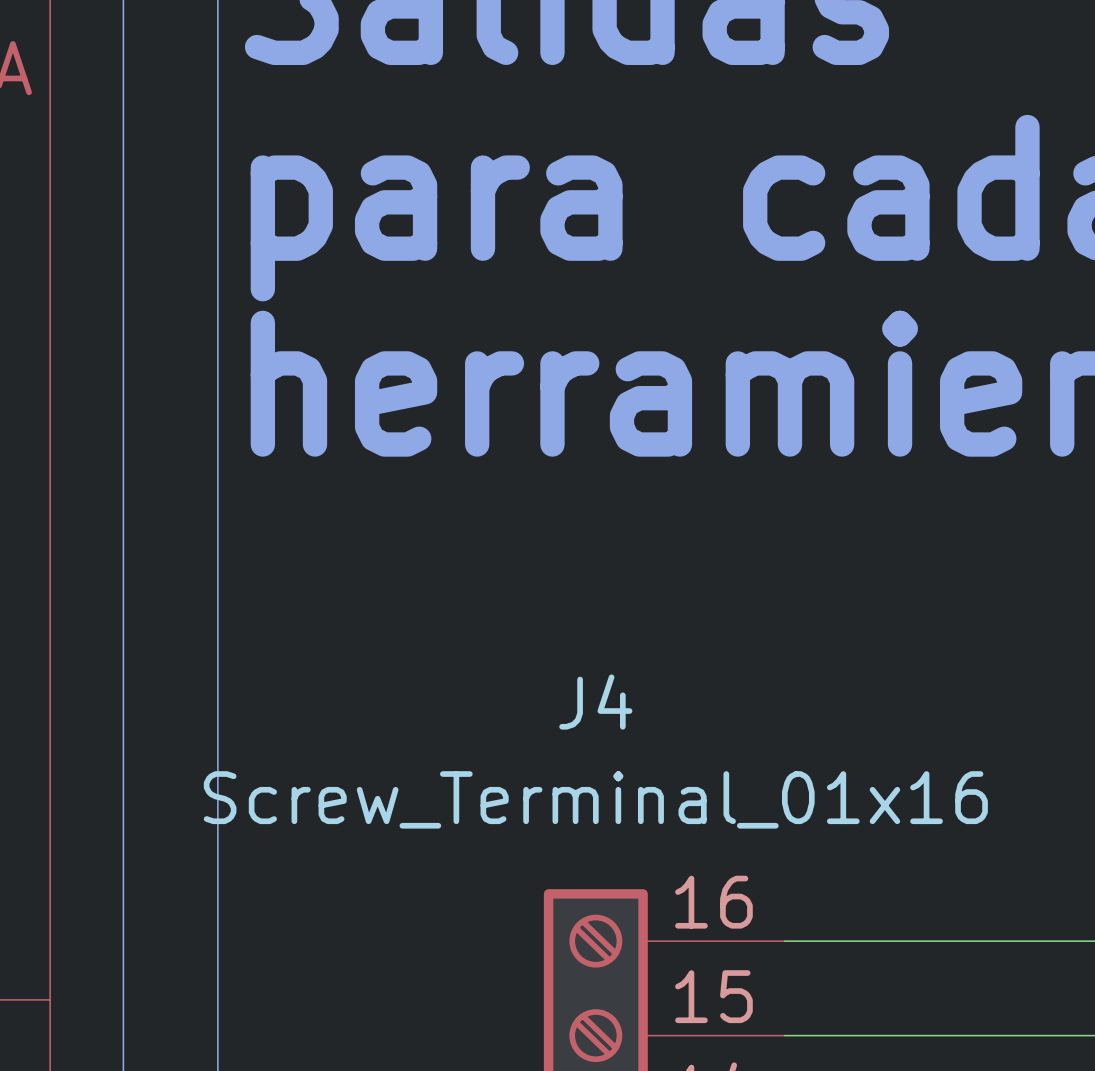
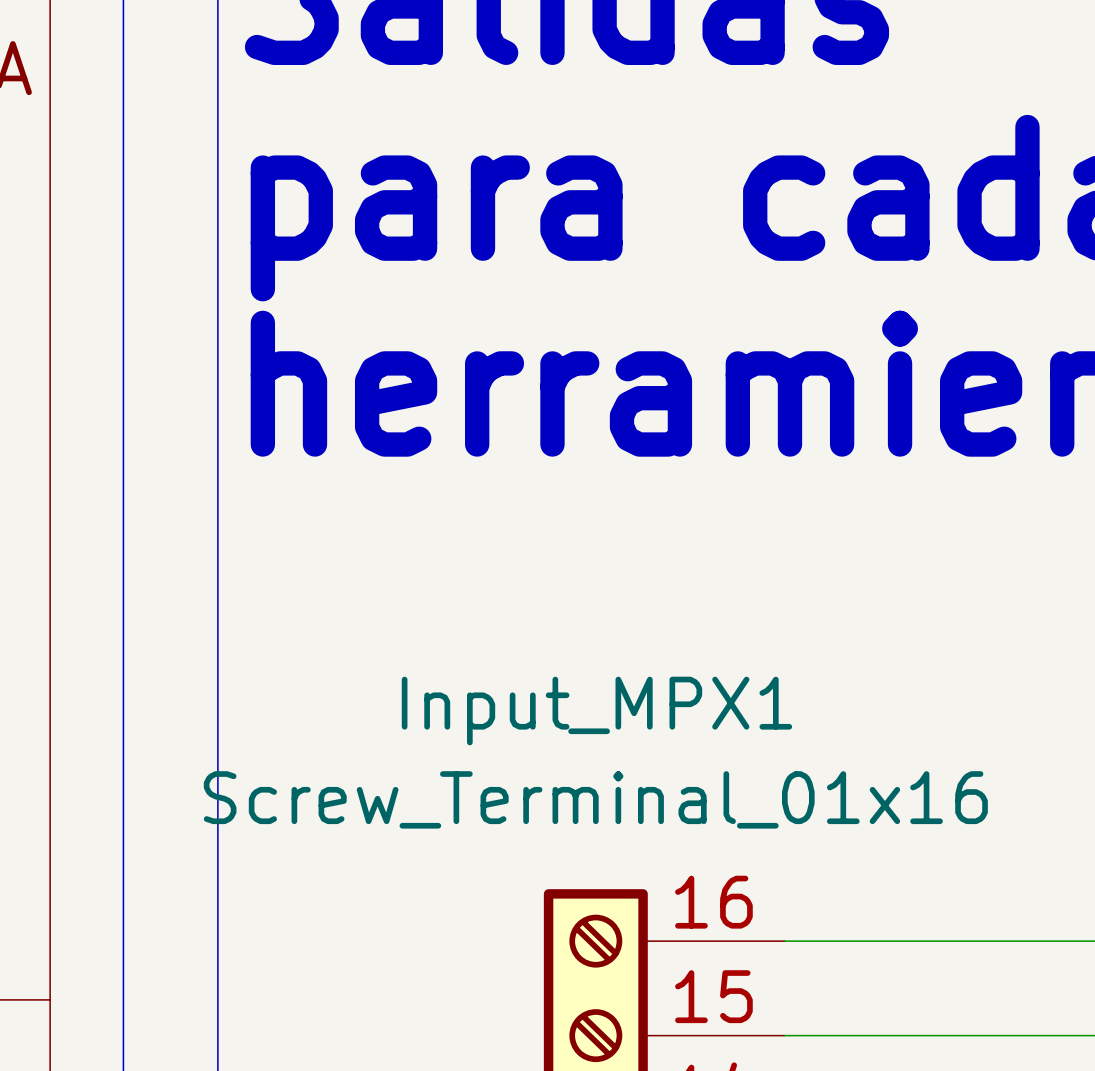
J4 name: J4 (595, 702) -> Input_MPX1 (596, 711)

